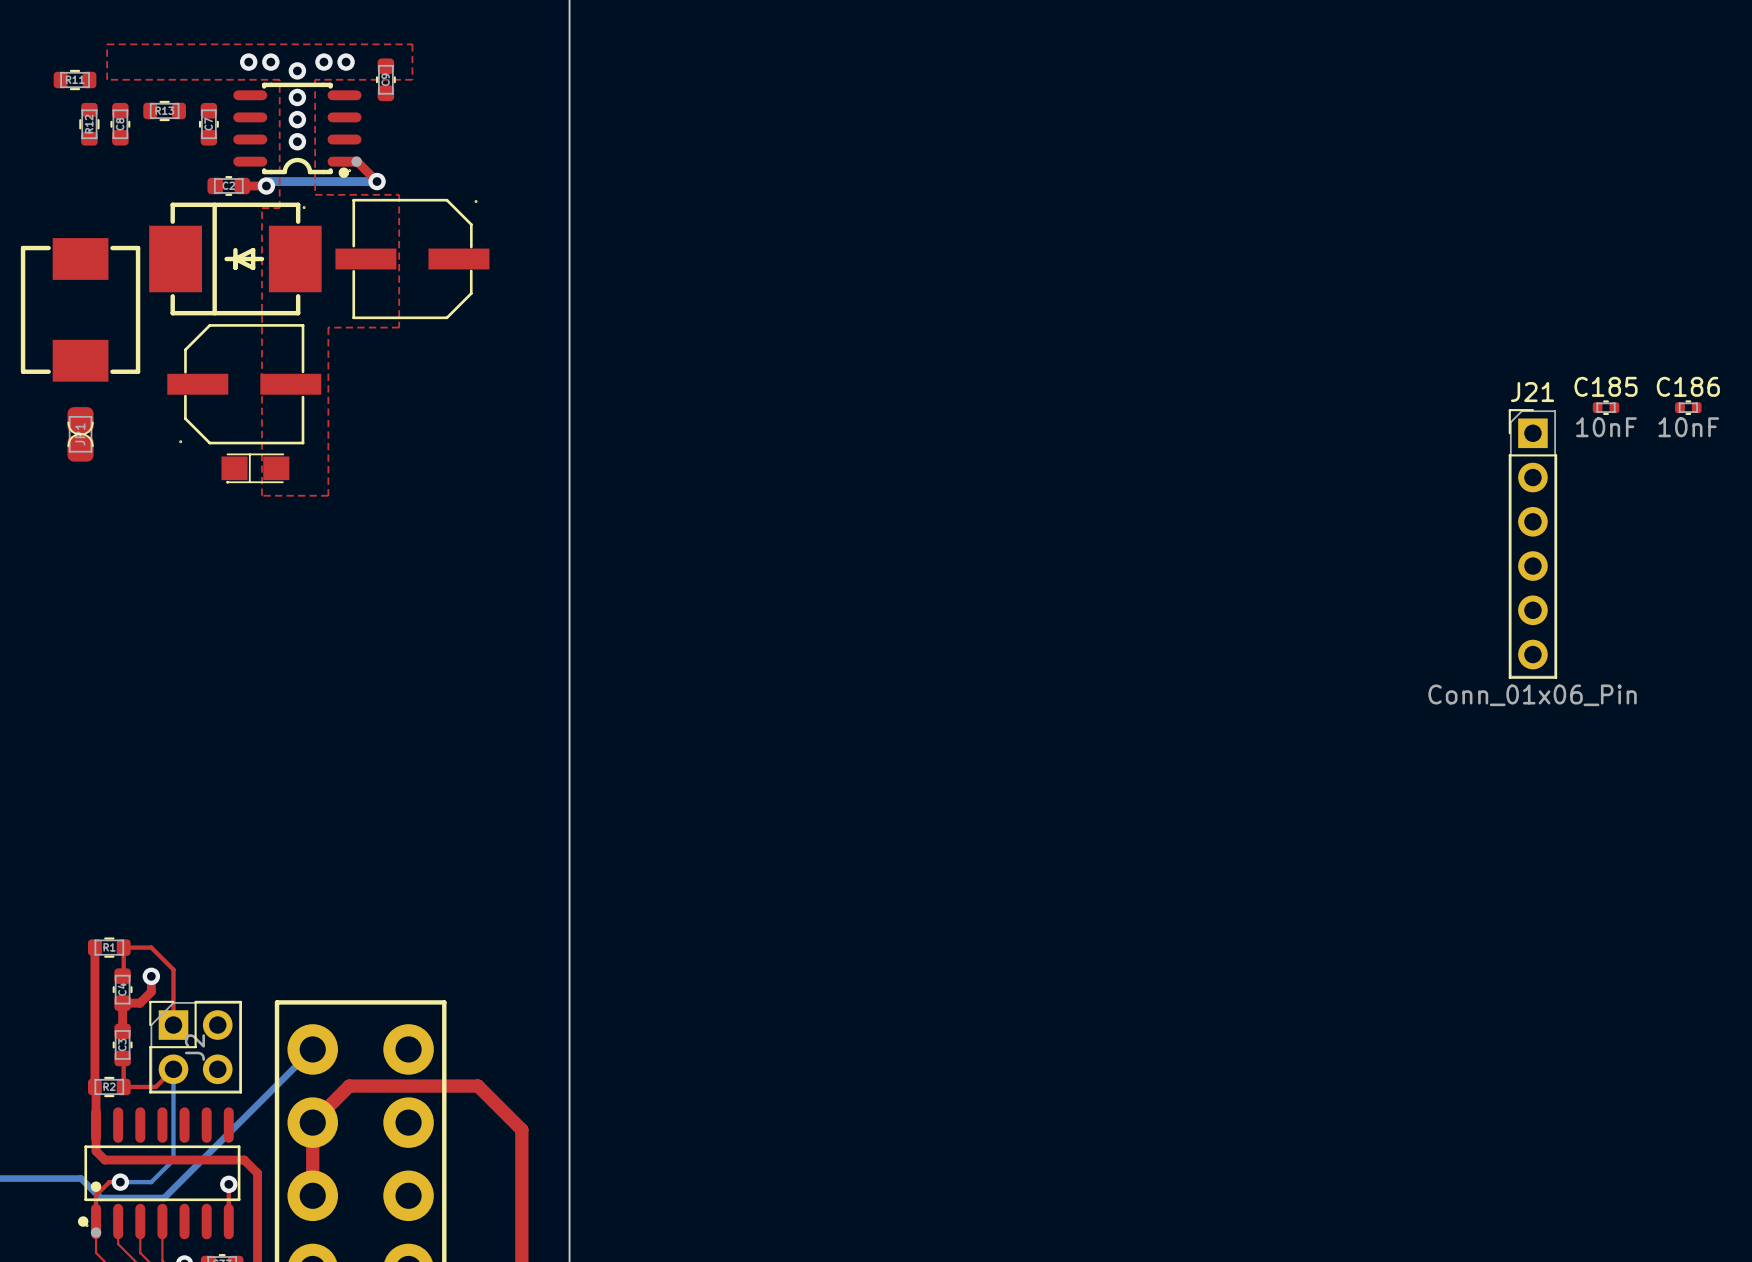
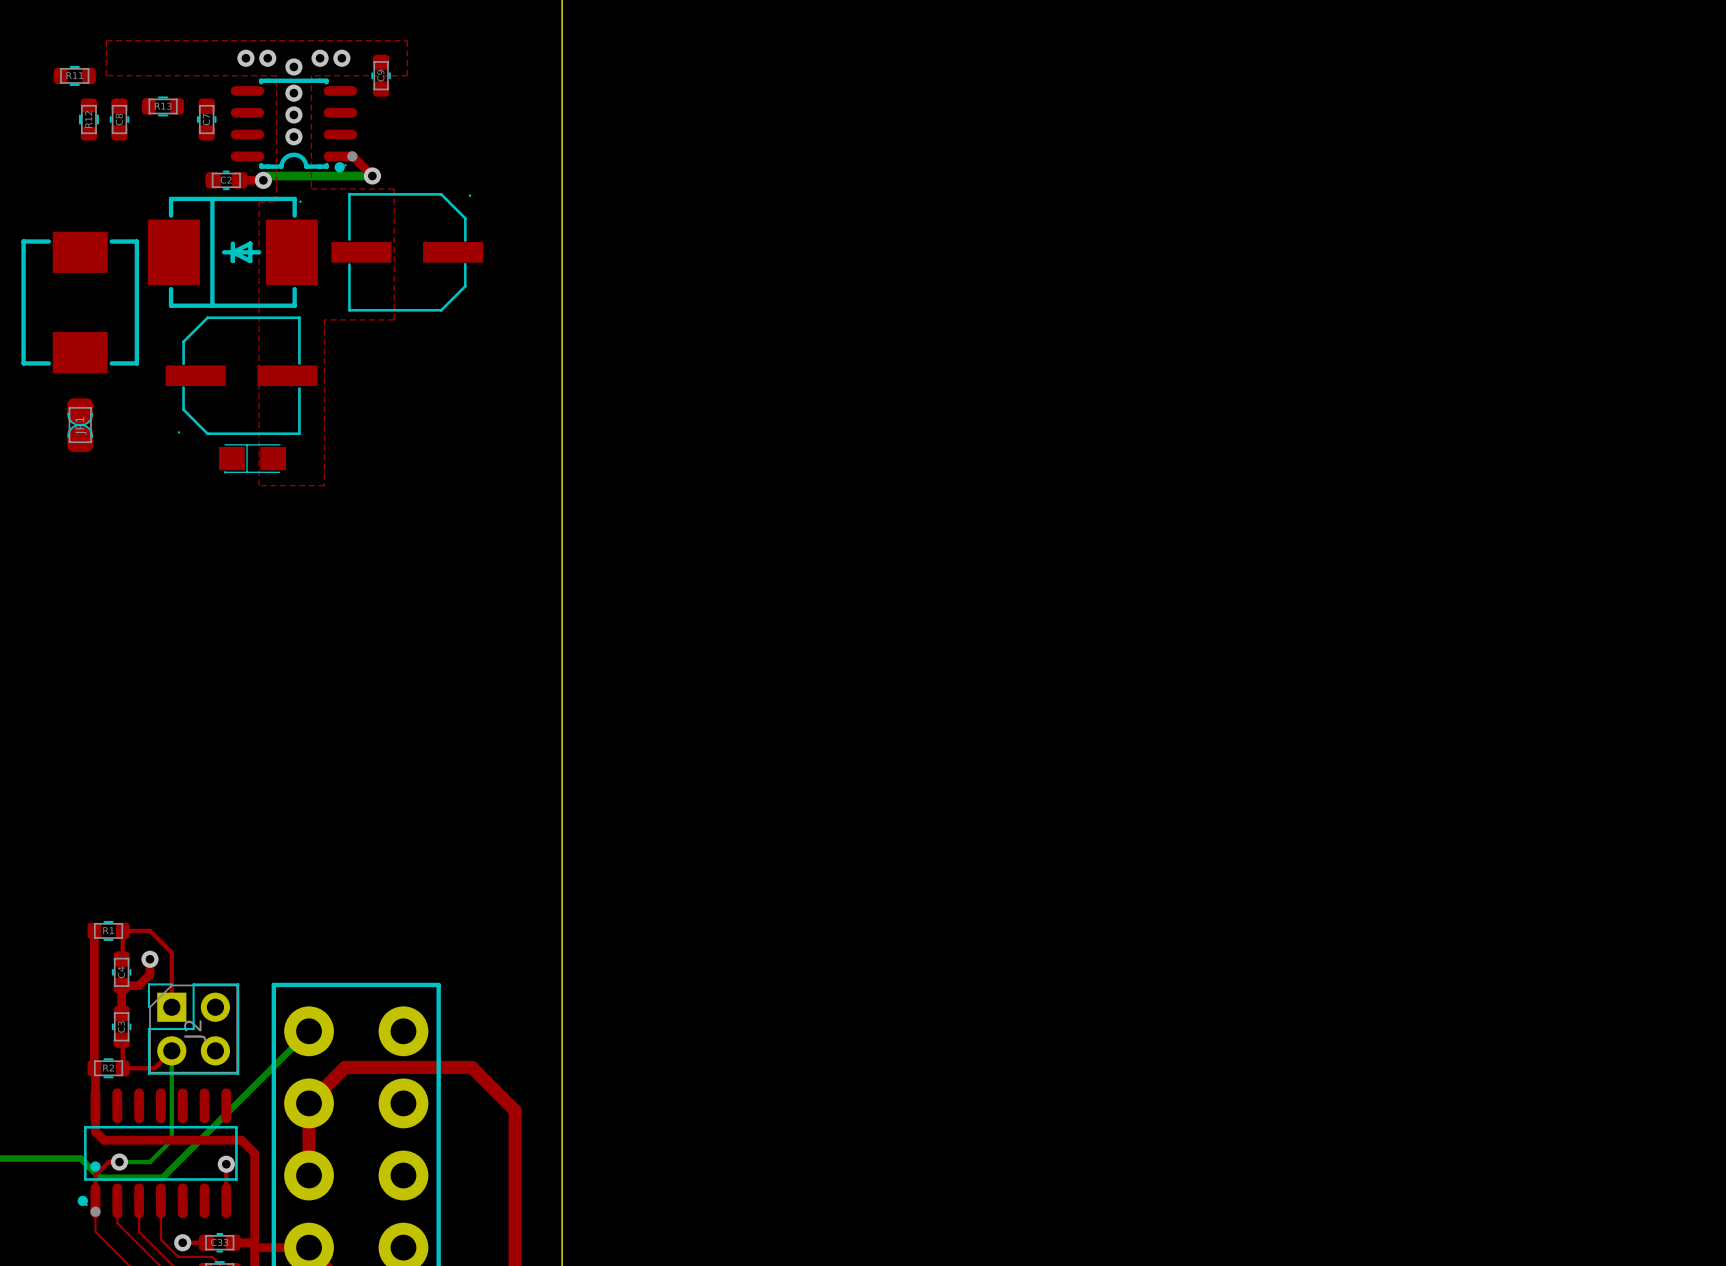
C185: 10nF (1606, 407) -> none
C186: 10nF (1688, 407) -> none
J21: Conn_01x06_Pin (1532, 543) -> none

